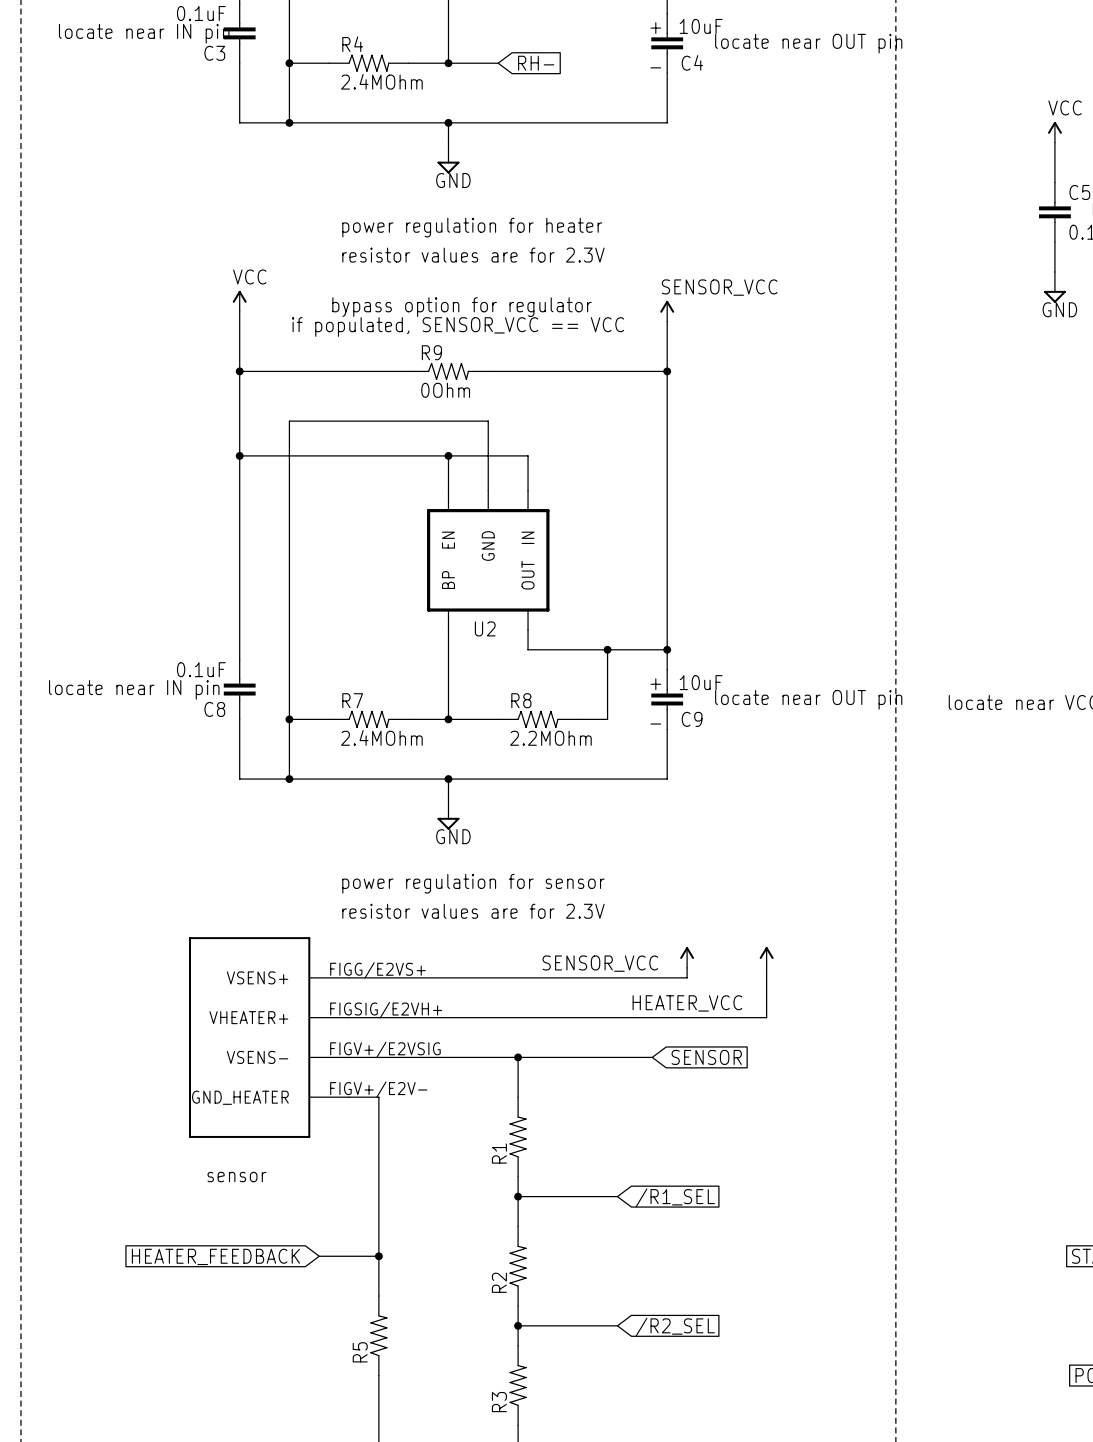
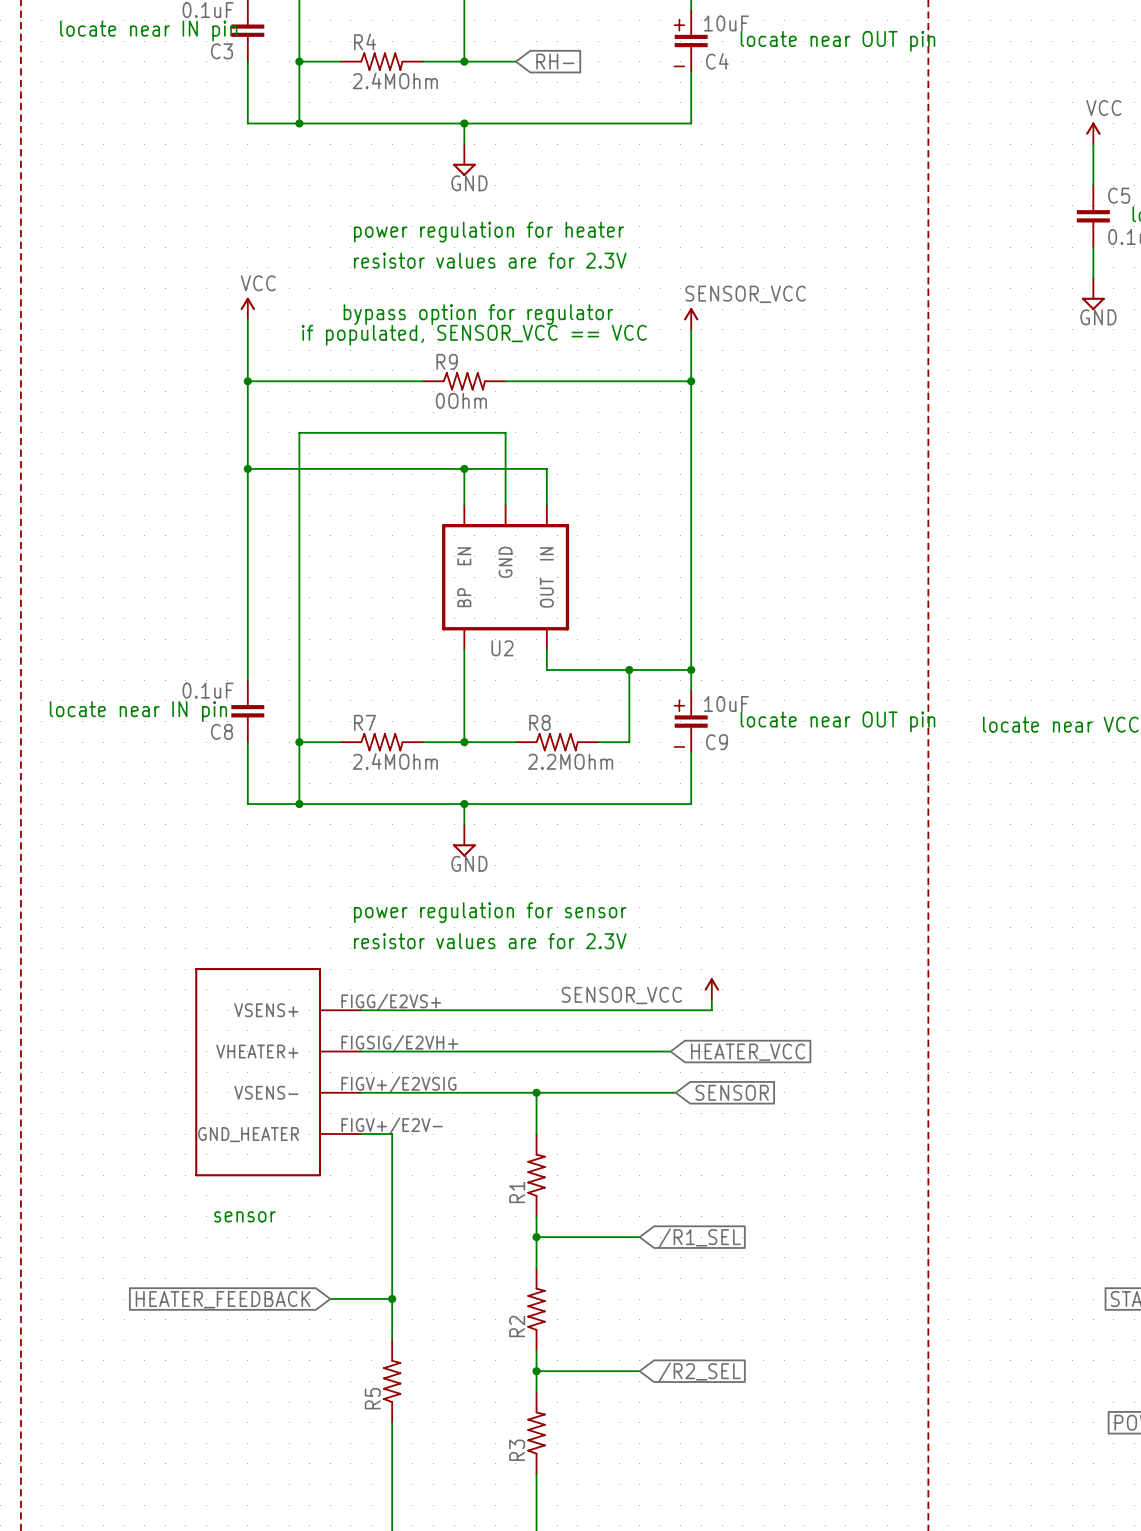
power symbol: HEATER_VCC (766, 957) -> none
wire: (766, 967) (766, 1017) (647, 1017) -> none
global label: none -> HEATER_VCC (748, 1052)

